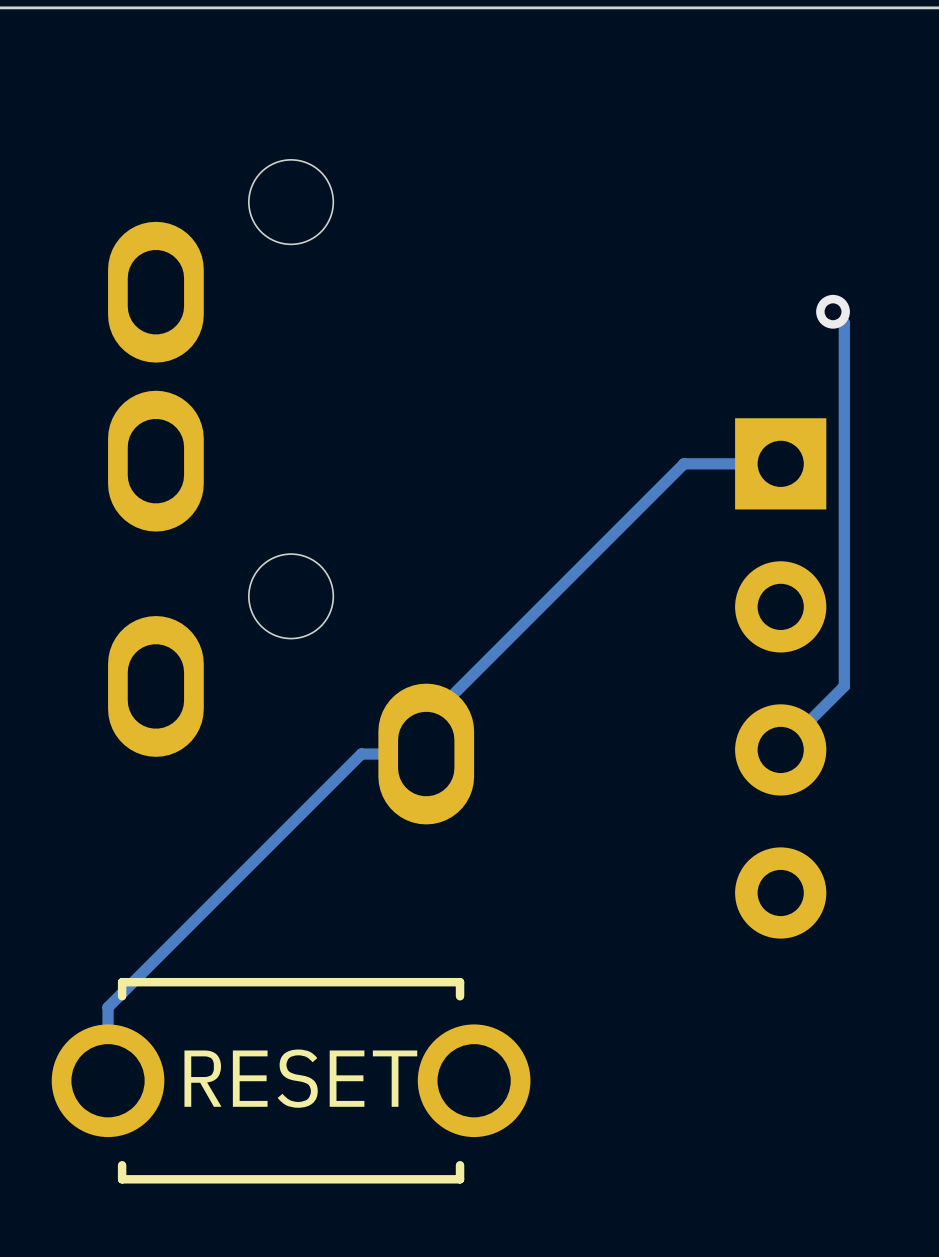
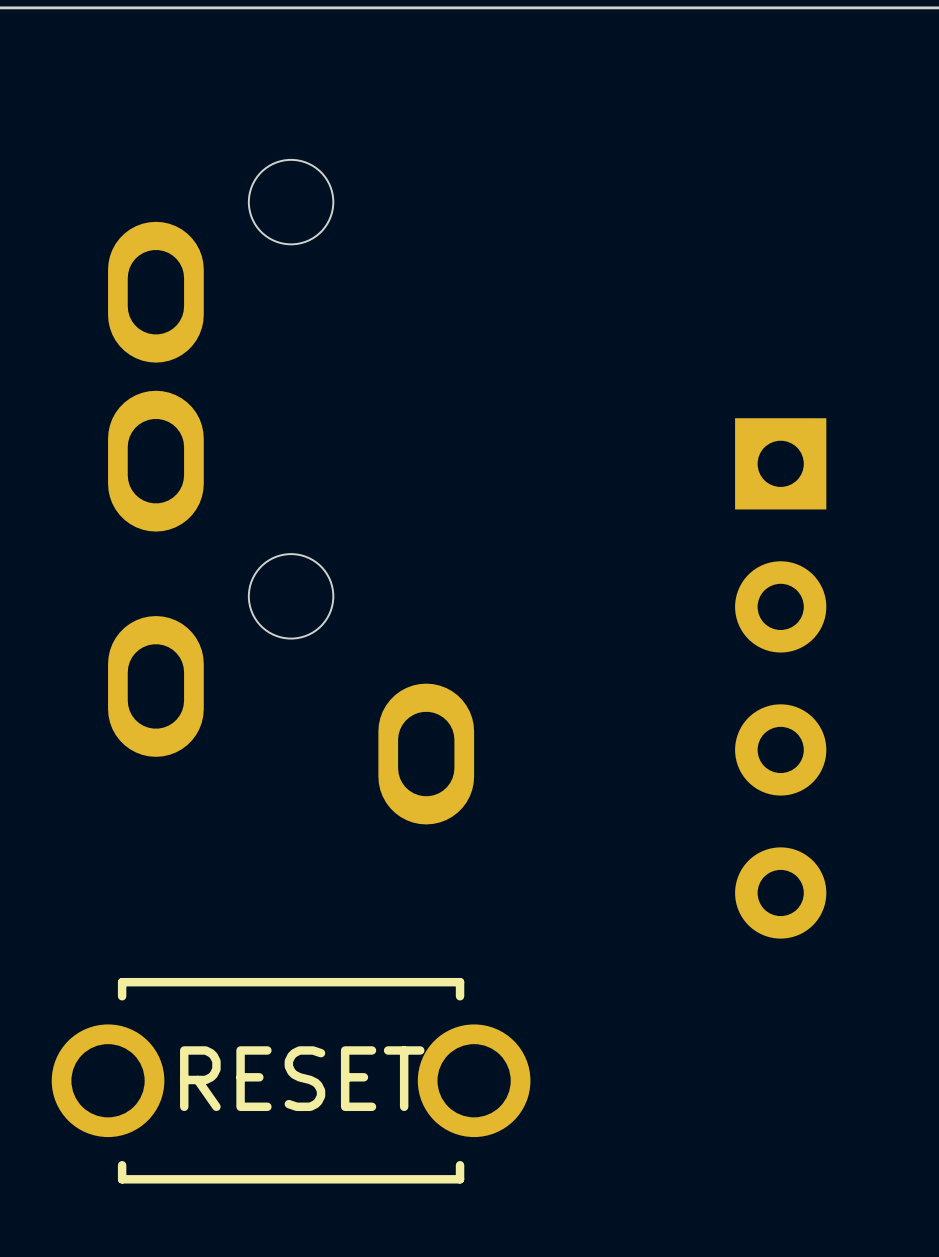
track: (833, 311) (844, 323) (844, 686) (780, 749) -> none
via: (833, 311) -> none
track: (780, 463) (683, 463) (393, 754) -> none
track: (426, 754) (361, 754) (108, 1007) (108, 1080) -> none

